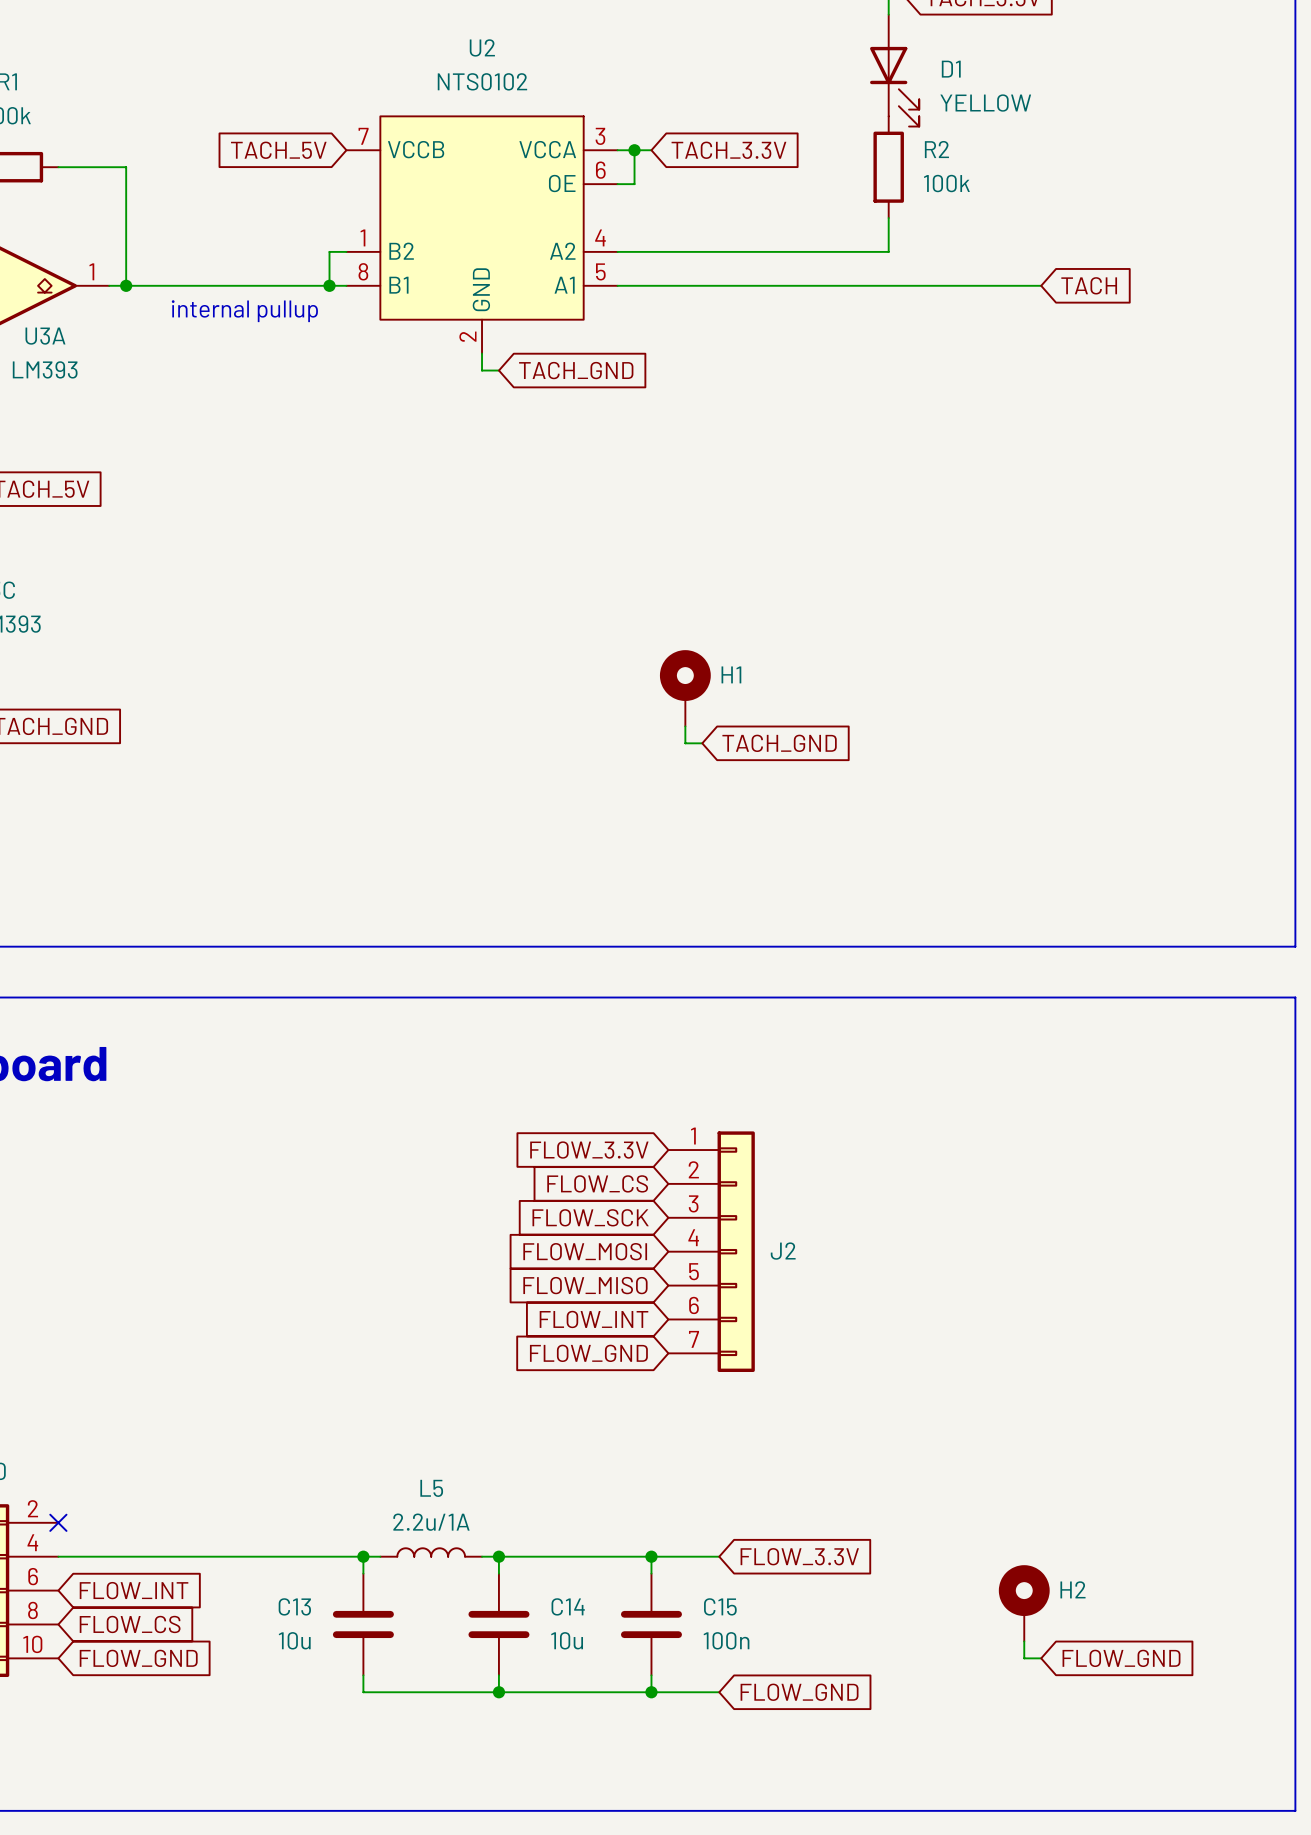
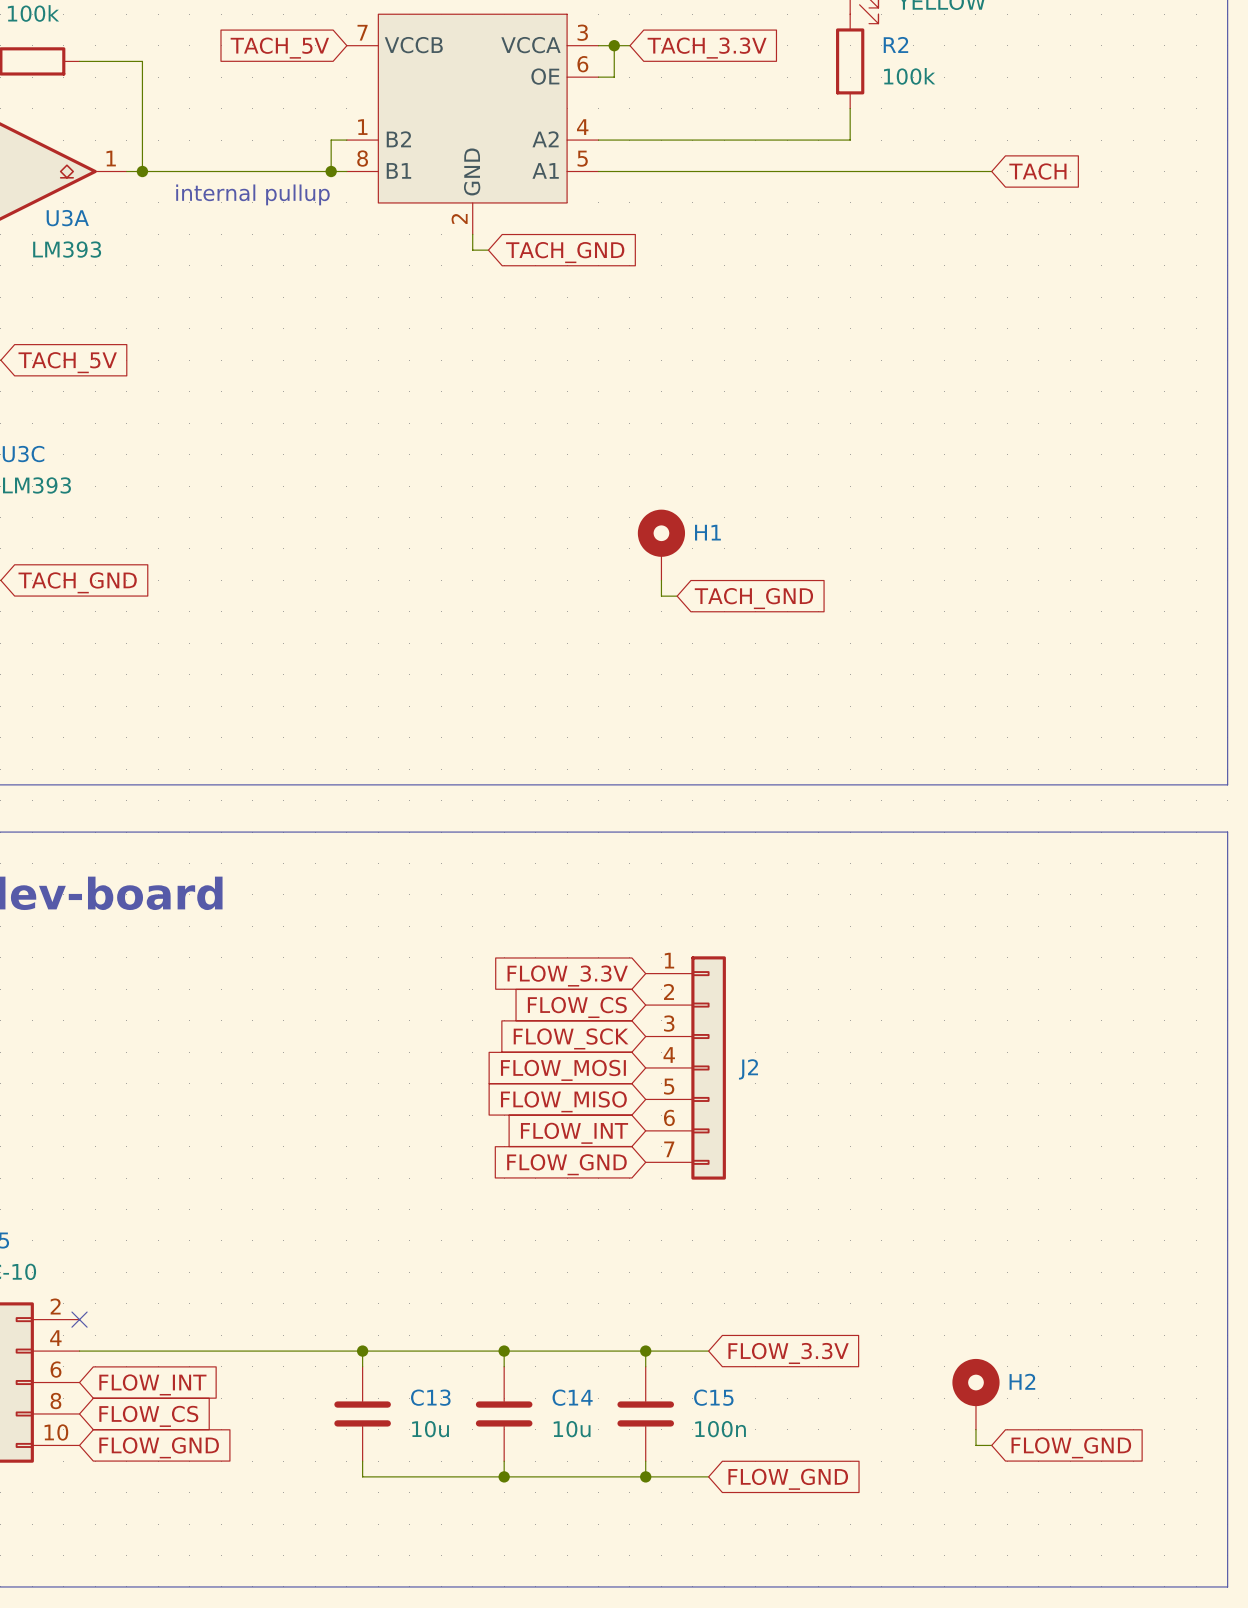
L5: 2.2u/1A (431, 1552) -> none
wire: none -> (378, 1351) (472, 1351)
wire: (498, 1556) (498, 1573) -> (504, 1351) (504, 1366)
junction position: (498, 1556) -> (504, 1351)
wire: (651, 1556) (651, 1573) -> (645, 1351) (645, 1366)
junction position: (651, 1556) -> (645, 1351)
wire: none -> (692, 1351) (708, 1351)
global label position: FLOW_3.3V (799, 1556) -> FLOW_3.3V (788, 1353)
C13 name position: C13 (294, 1606) -> C13 (430, 1397)
C14 position: (498, 1624) -> (504, 1413)
C15 position: (651, 1624) -> (645, 1413)
C13 value position: 10u (294, 1640) -> 10u (430, 1429)
wire: (498, 1675) (498, 1692) -> (504, 1461) (504, 1476)
wire: (651, 1675) (651, 1692) -> (645, 1461) (645, 1476)
junction position: (498, 1692) -> (504, 1476)
junction position: (651, 1692) -> (645, 1476)
wire: none -> (692, 1476) (708, 1476)
global label position: FLOW_GND (799, 1692) -> FLOW_GND (788, 1479)

